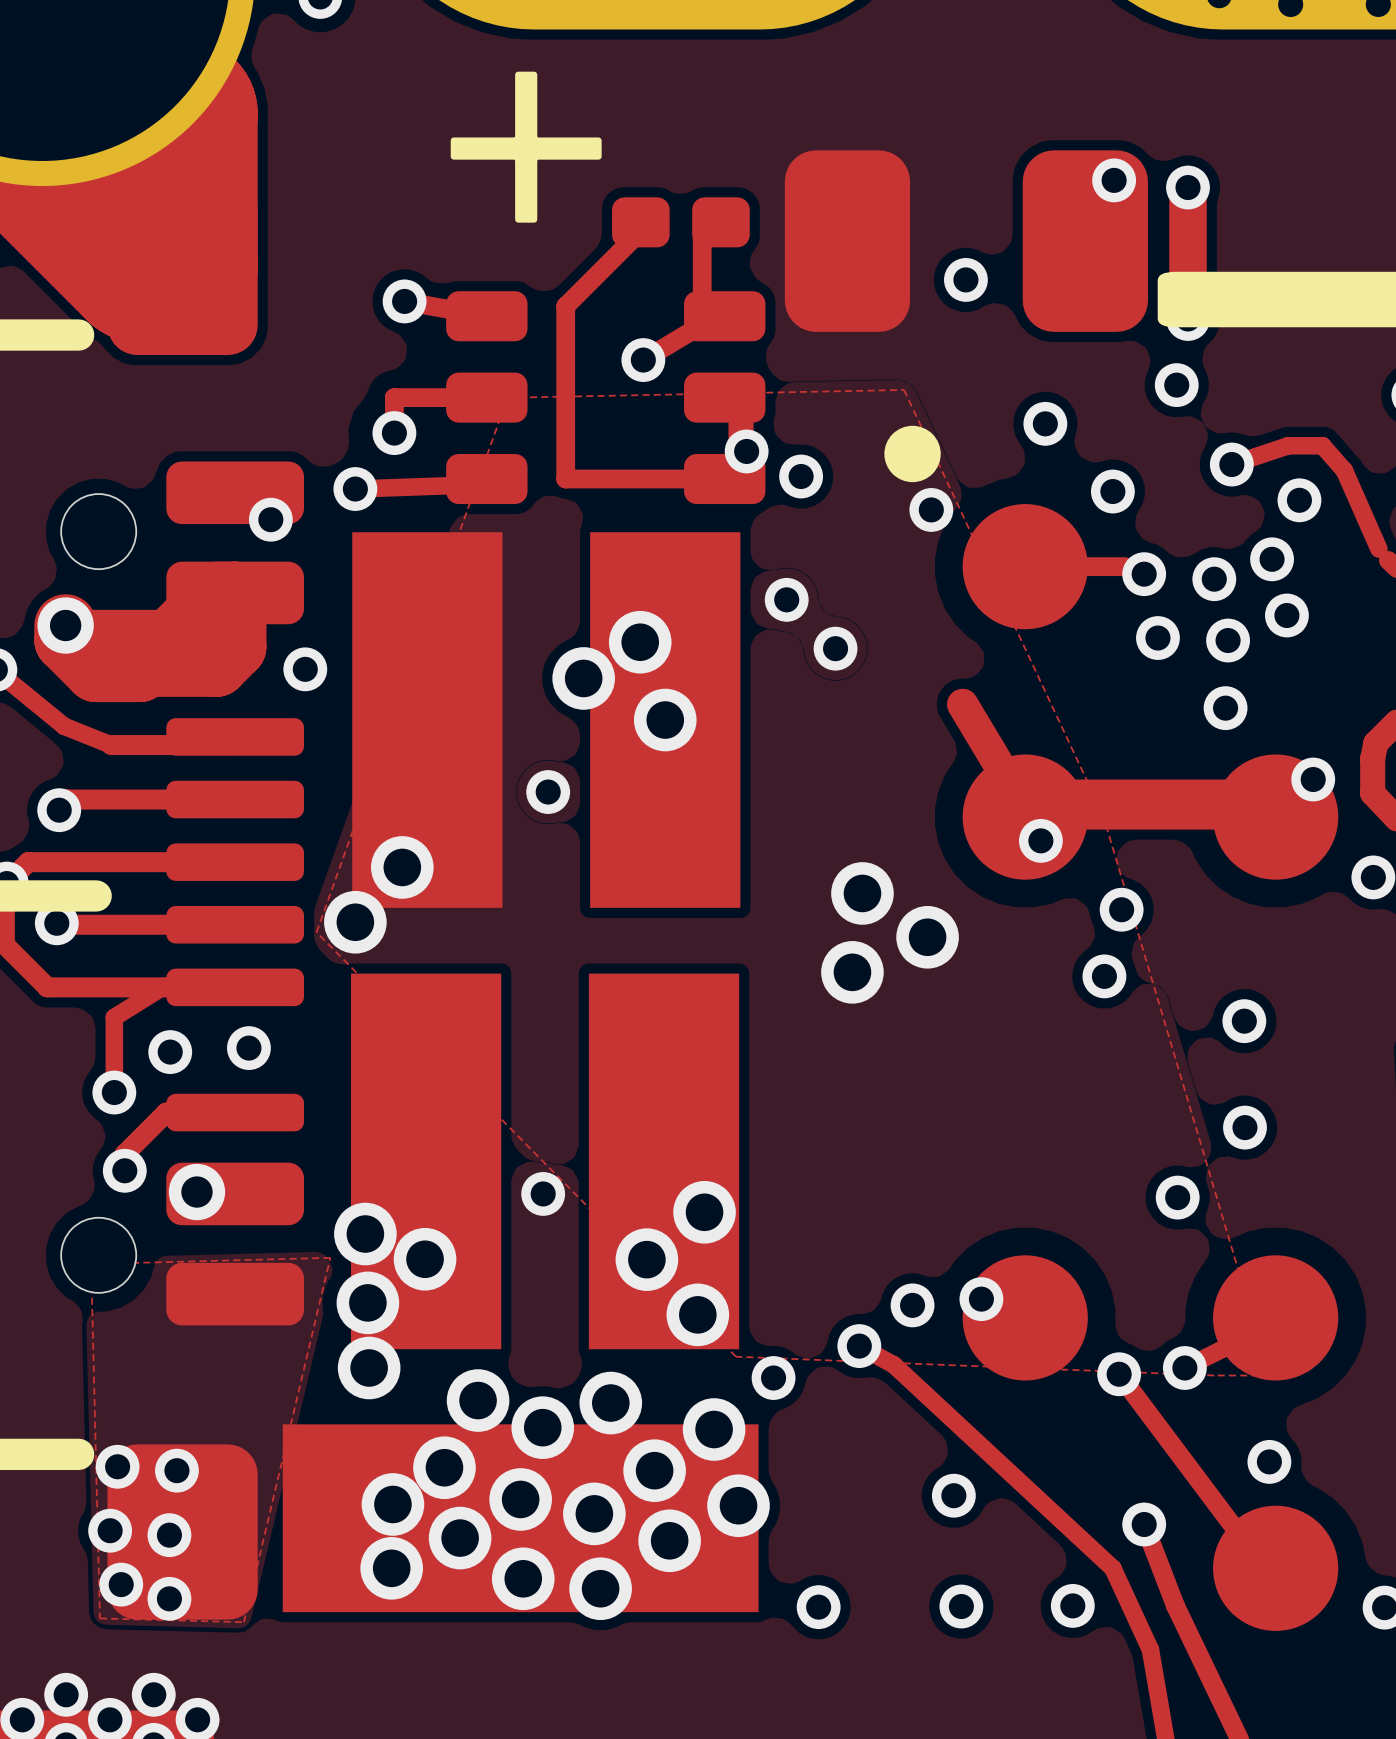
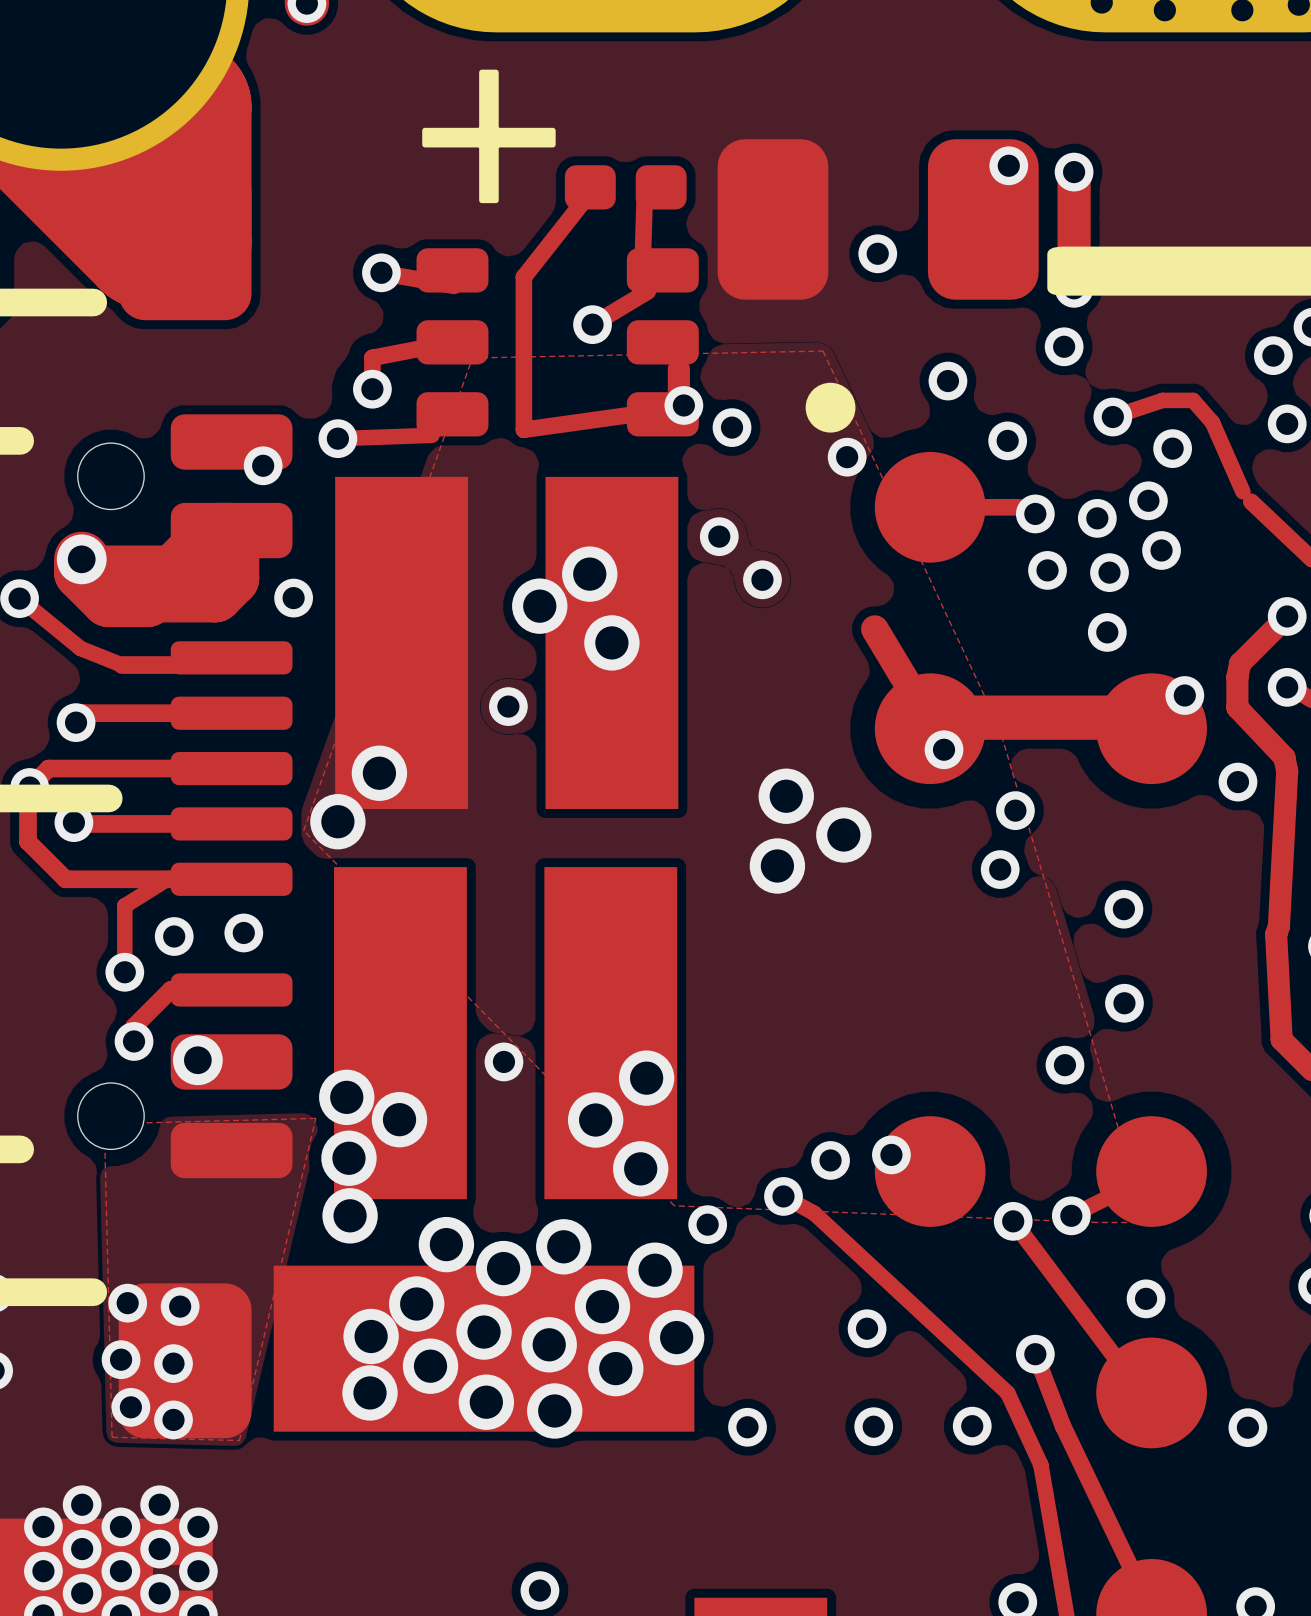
part position: (680, 222) -> (625, 187)
track: (702, 237) (702, 300) -> (644, 201) (642, 256)
track: (630, 241) (565, 306) -> (581, 203) (523, 277)
track: (394, 397) (486, 397) -> (372, 357) (452, 342)
part position: (605, 397) -> (557, 342)
track: (565, 479) (693, 479) -> (523, 429) (635, 414)

